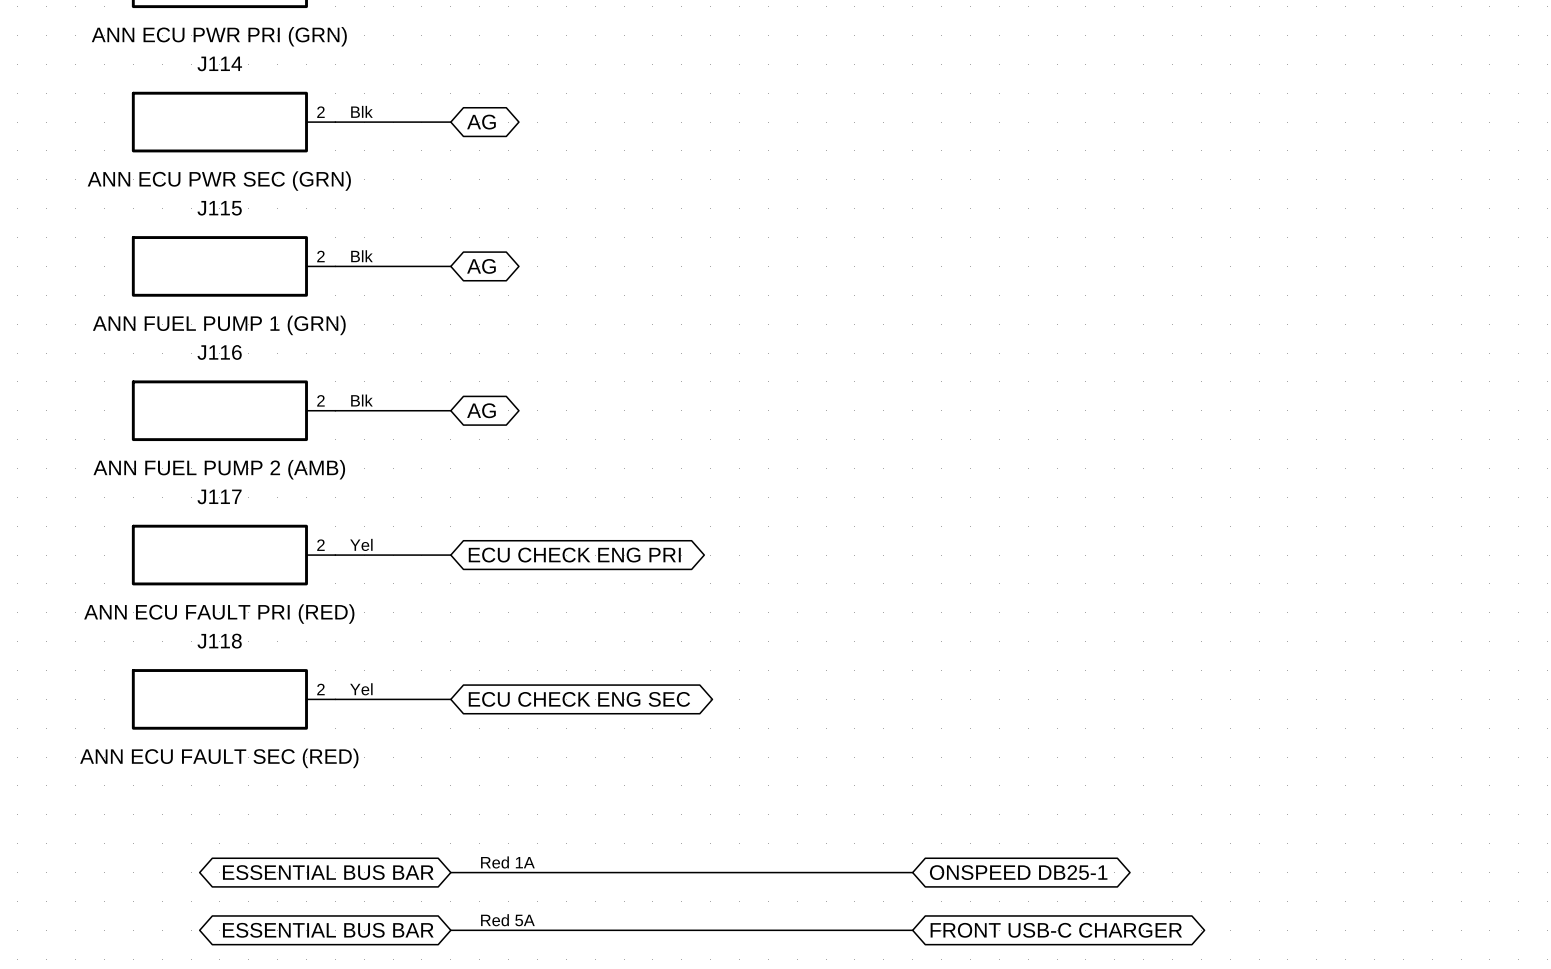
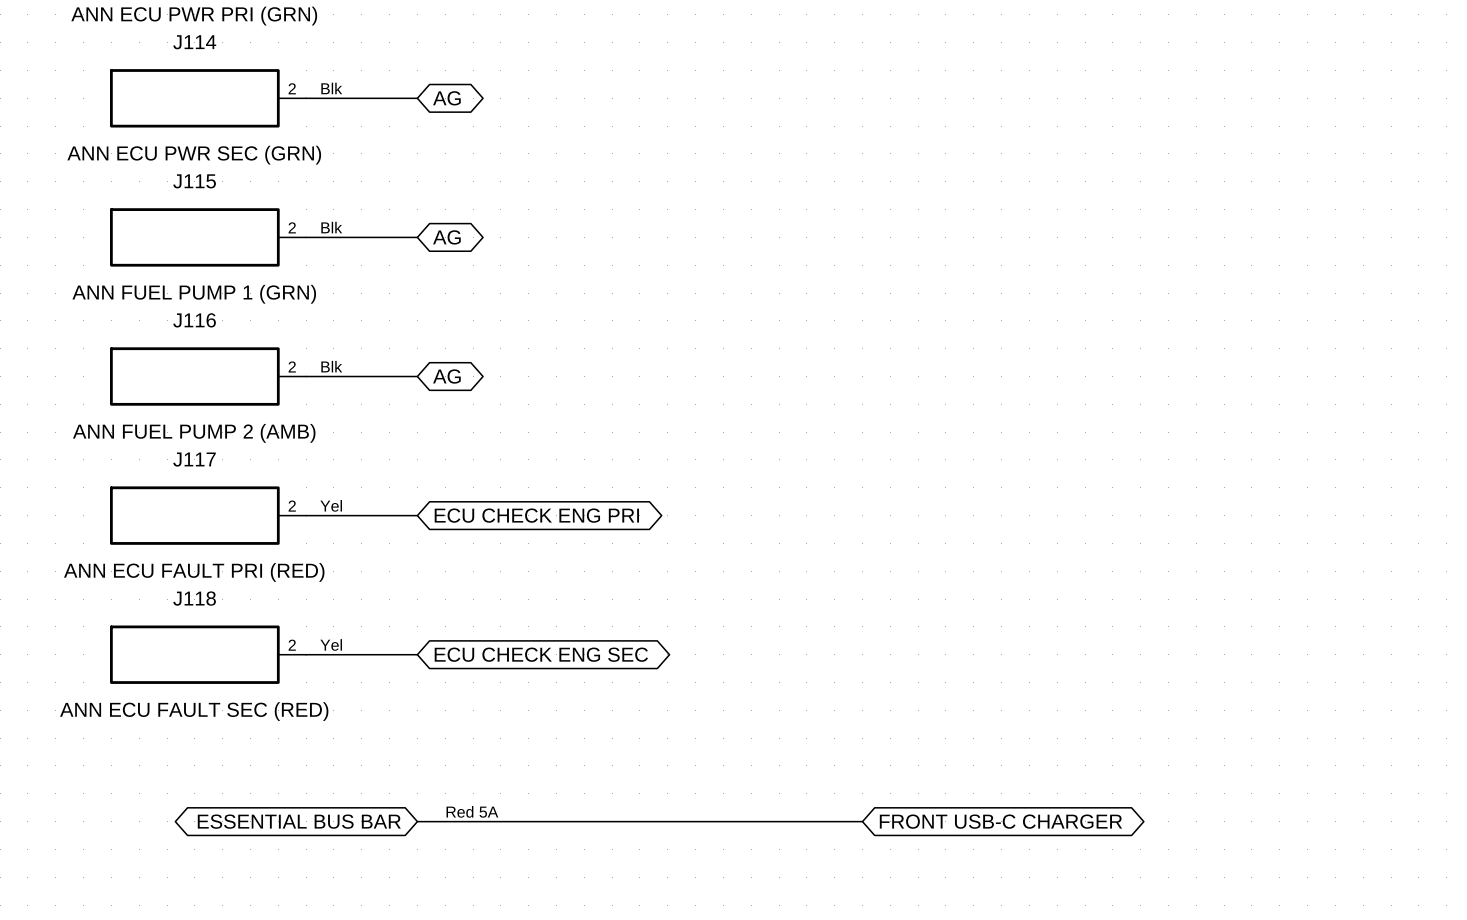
text: Red 1A (507, 862) -> Red 5A (472, 811)
global label: ONSPEED DB25-1 (1018, 872) -> FRONT USB-C CHARGER (1000, 821)
text: Red 5A (507, 920) -> none
global label: ESSENTIAL BUS BAR (328, 930) -> none
wire: (450, 930) (912, 930) -> none
global label: FRONT USB-C CHARGER (1056, 930) -> none

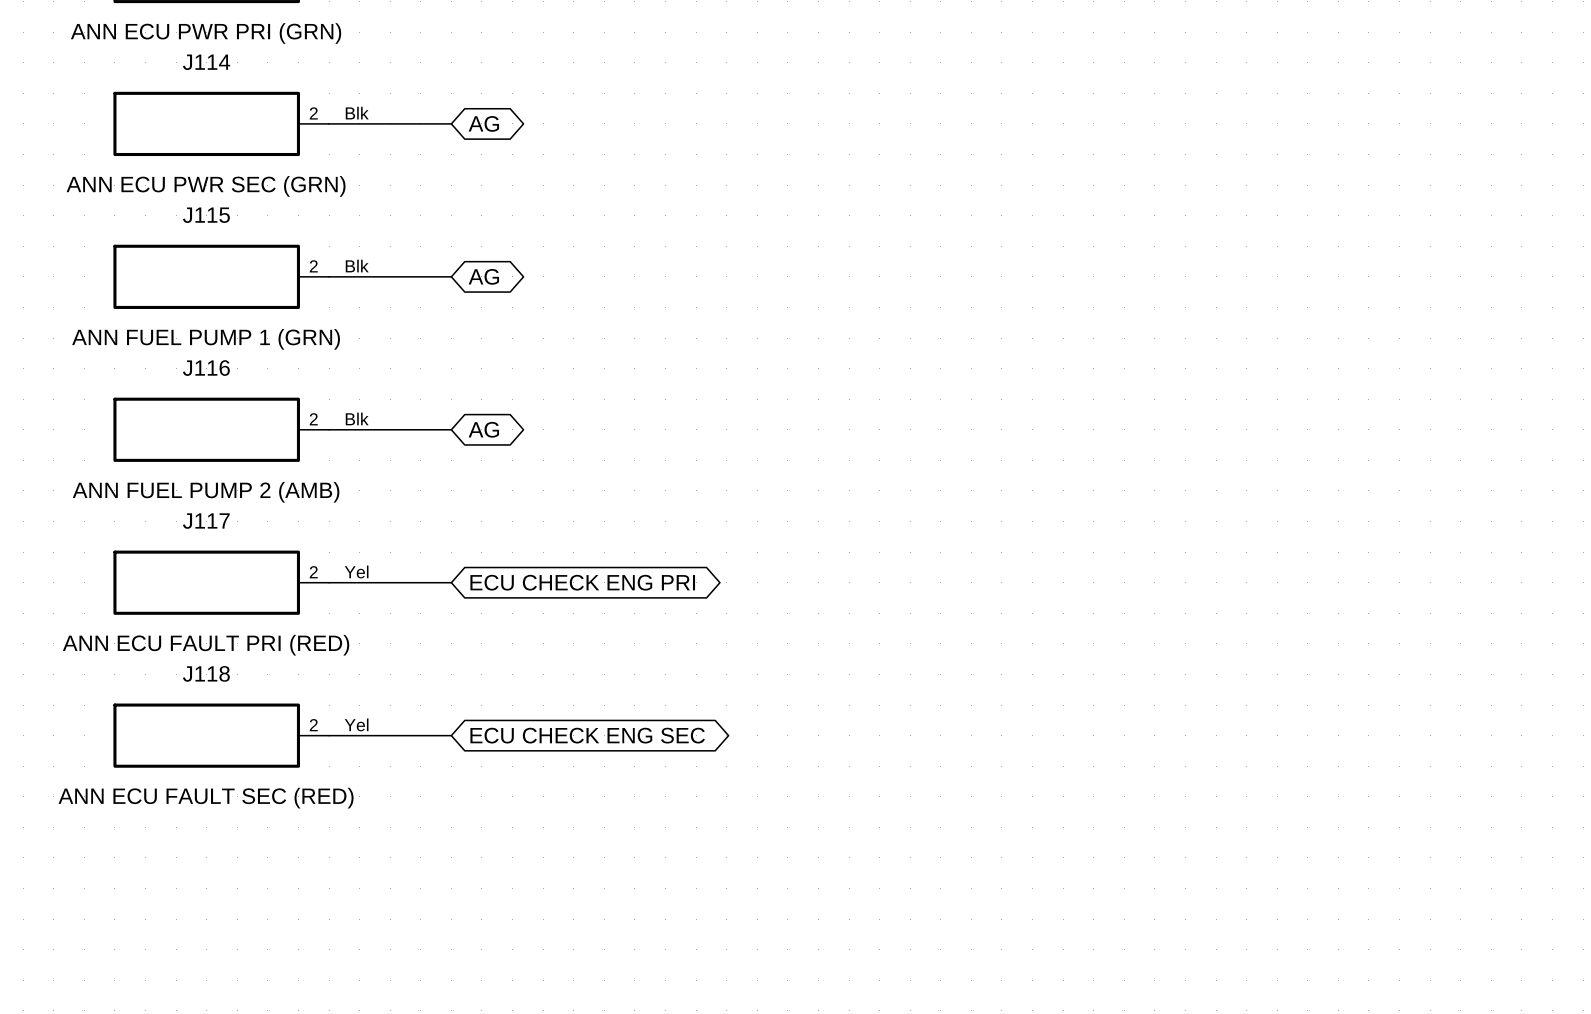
text: Red 5A (472, 811) -> none
global label: ESSENTIAL BUS BAR (299, 821) -> none
wire: (417, 821) (862, 821) -> none
global label: FRONT USB-C CHARGER (1000, 821) -> none

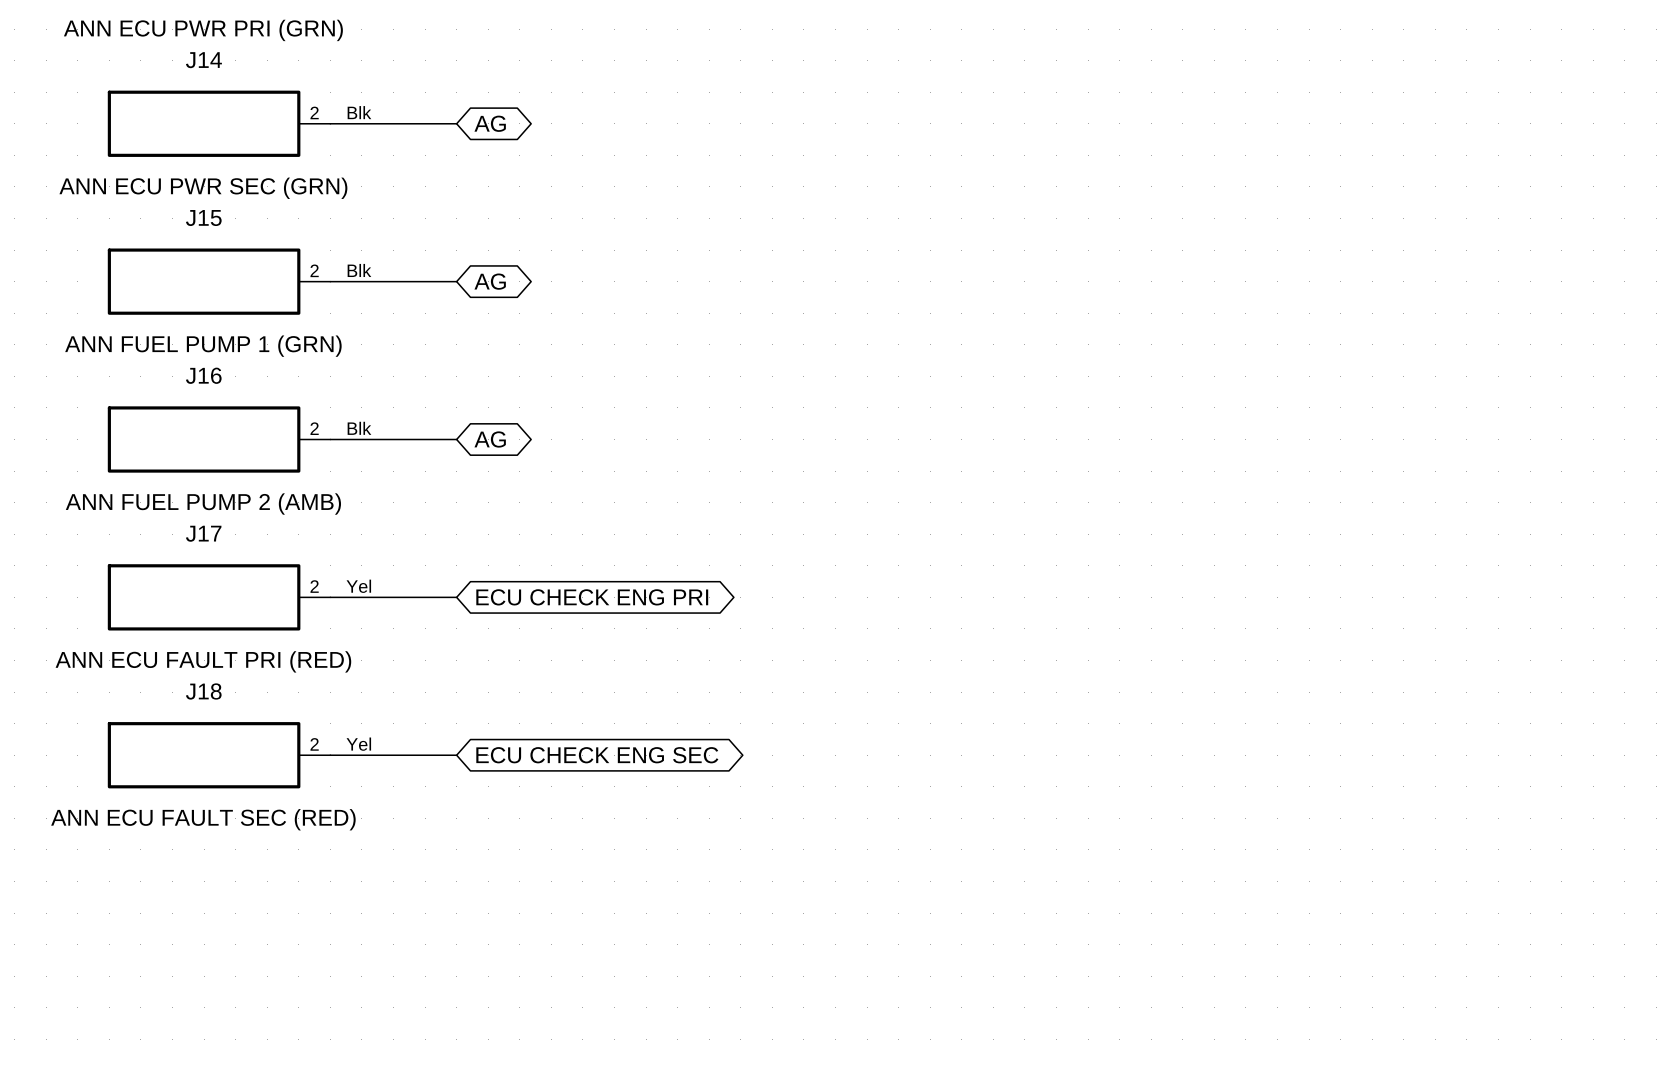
J114 name: J114 (206, 62) -> J14 (203, 60)
J115 name: J115 (206, 215) -> J15 (203, 218)
J116 name: J116 (206, 368) -> J16 (203, 375)
J117 name: J117 (206, 521) -> J17 (203, 533)
J118 name: J118 (206, 673) -> J18 (203, 691)

